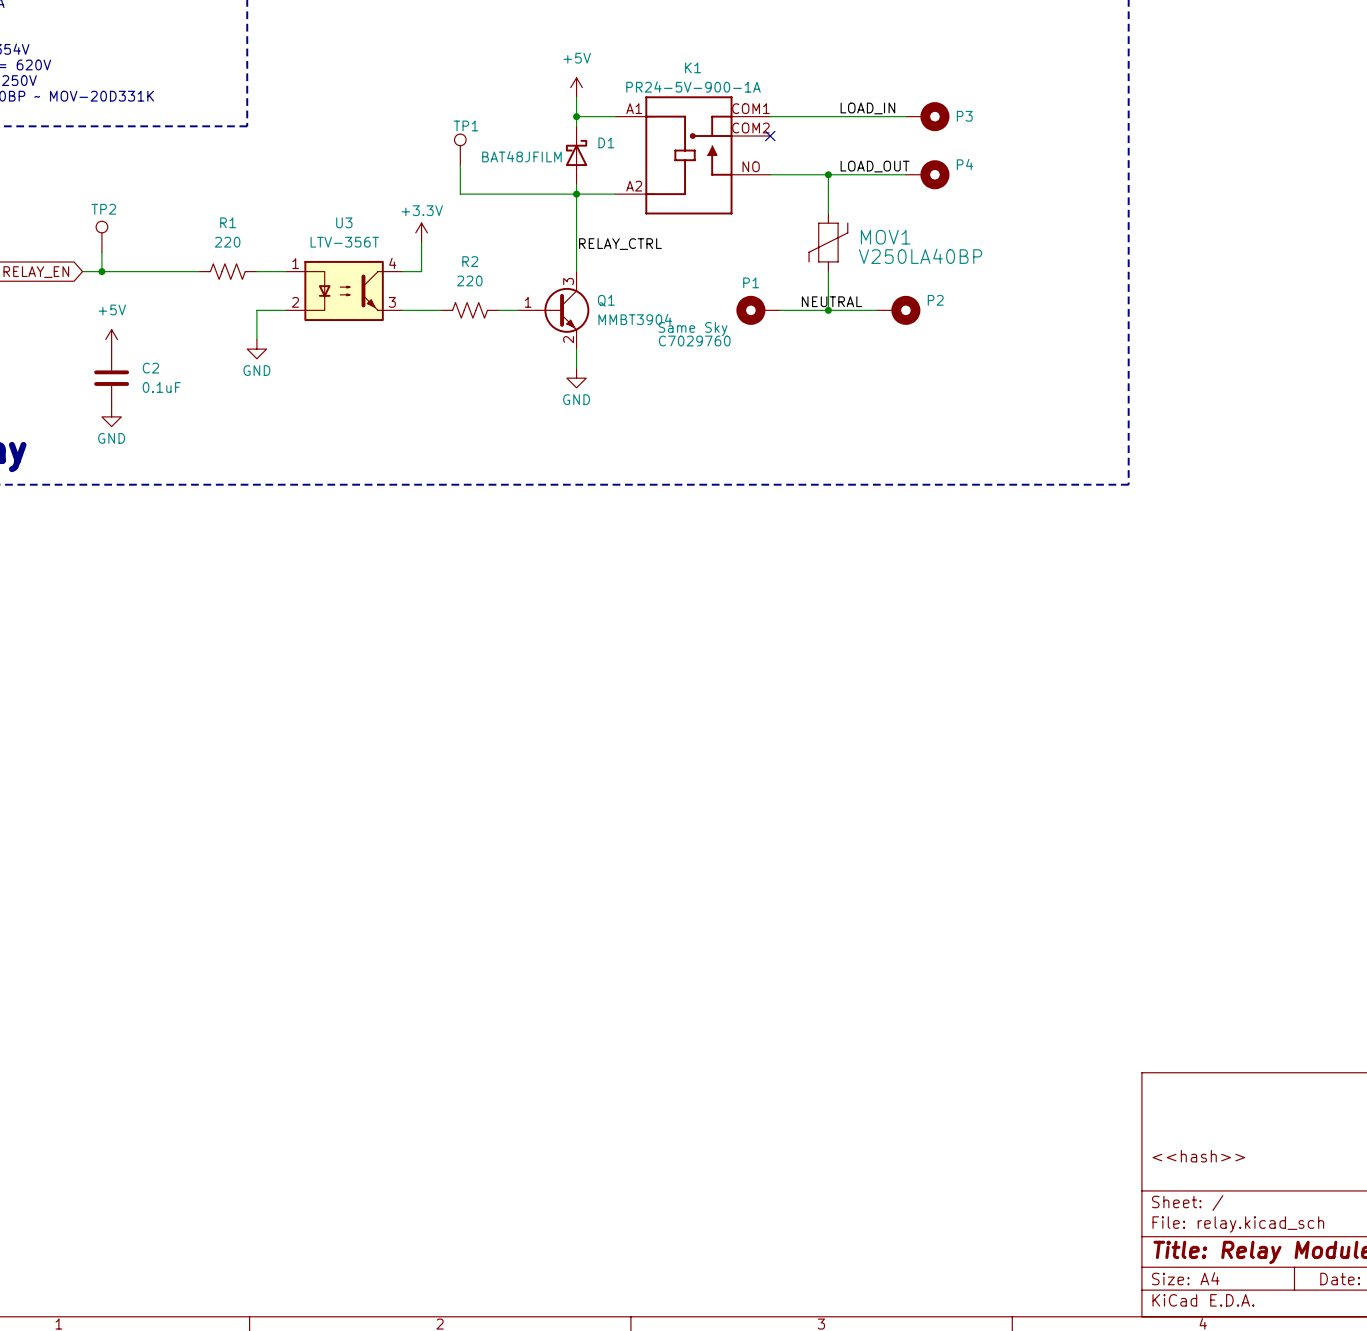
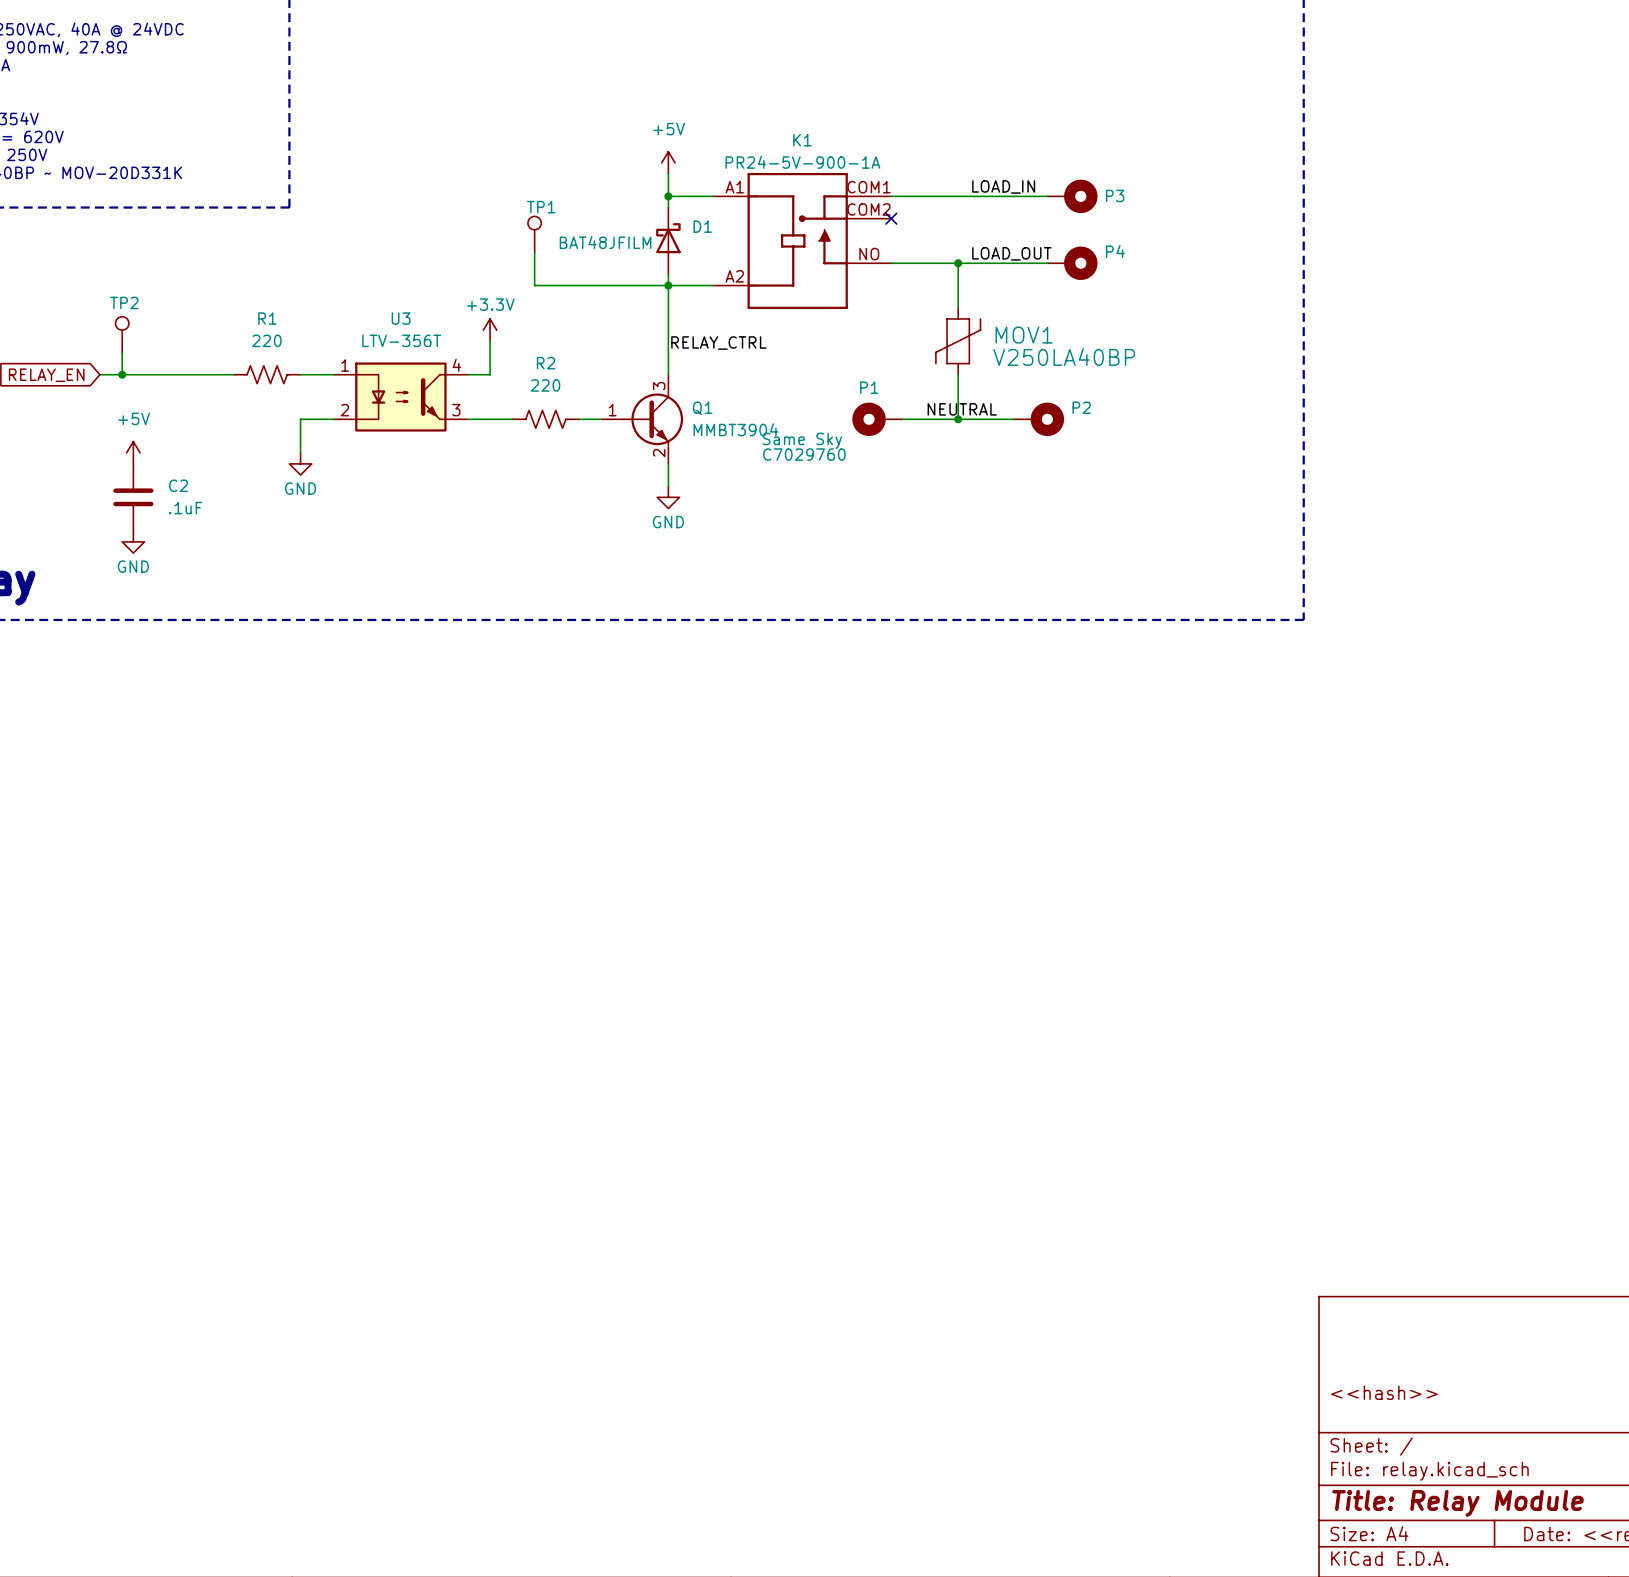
C2 value: 0.1uF (161, 387) -> .1uF (185, 508)

